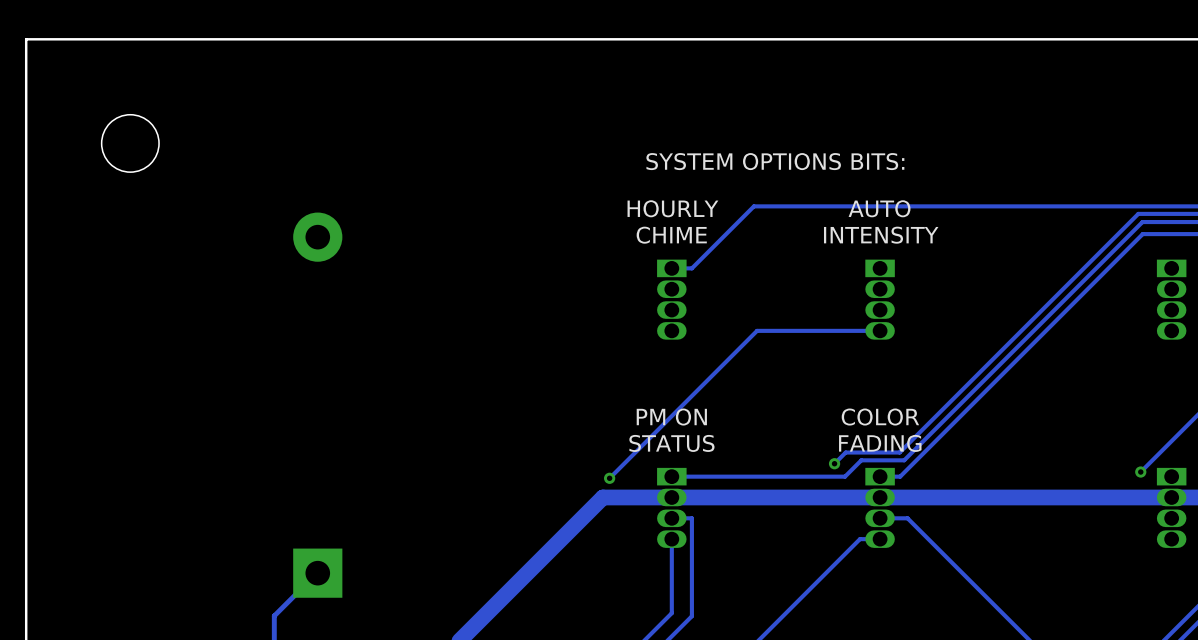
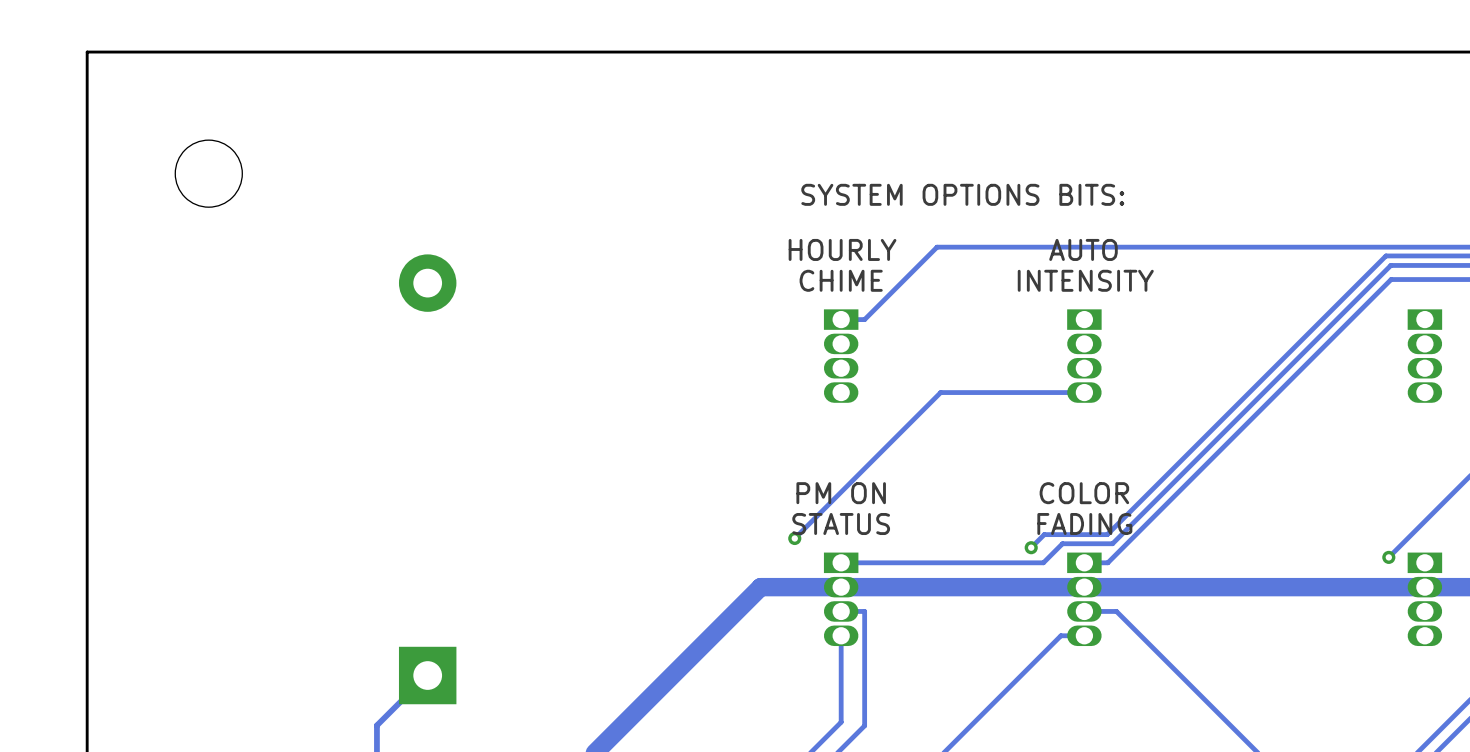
track: (632, 455) (609, 478) -> none
via position: (609, 478) -> (794, 538)

